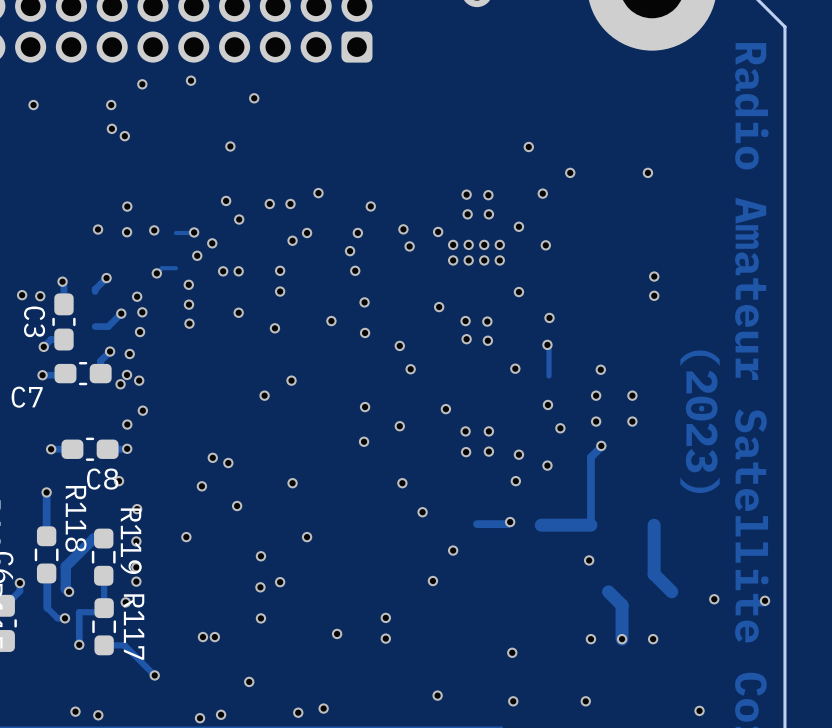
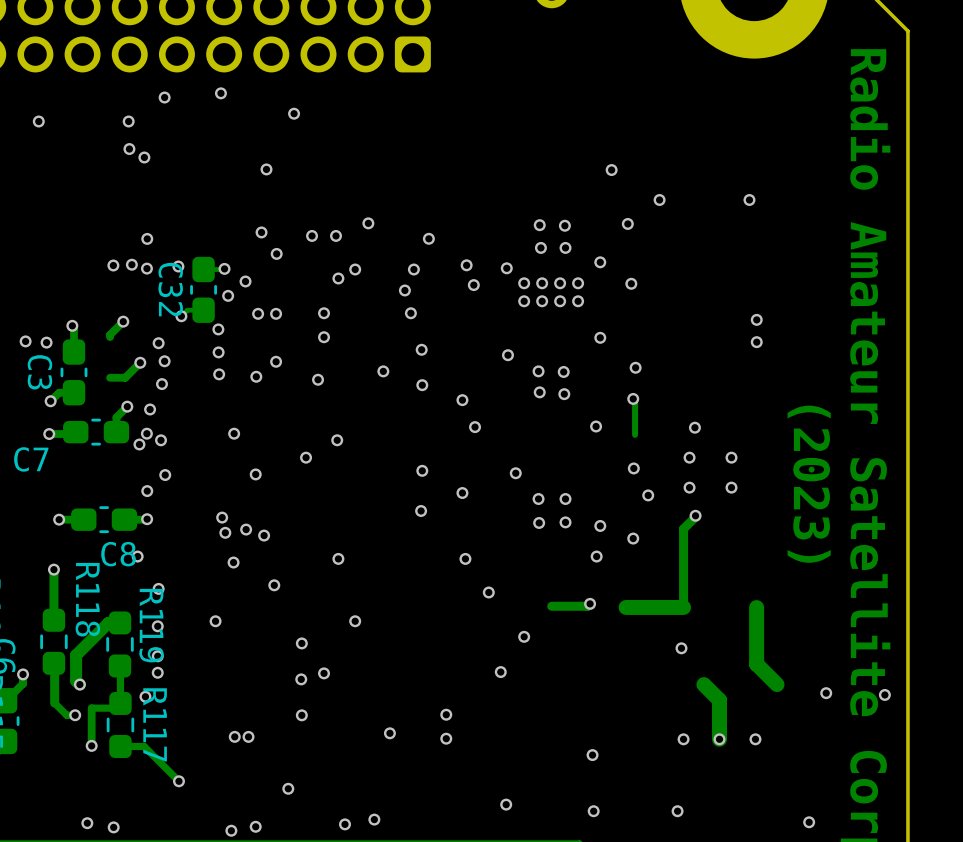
via: none -> (131, 264)
C32: none -> (203, 289)
via: none -> (256, 376)
via: none -> (234, 433)
via: none -> (255, 474)
via: none -> (222, 517)
via: none -> (225, 532)

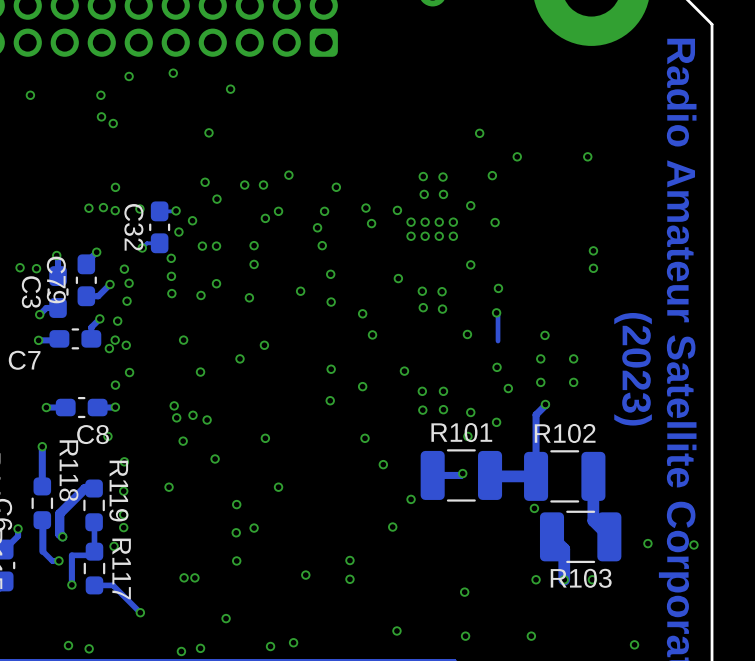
C79: none -> (86, 280)
R101: none -> (461, 475)
R102: none -> (564, 476)
R103: none -> (580, 536)

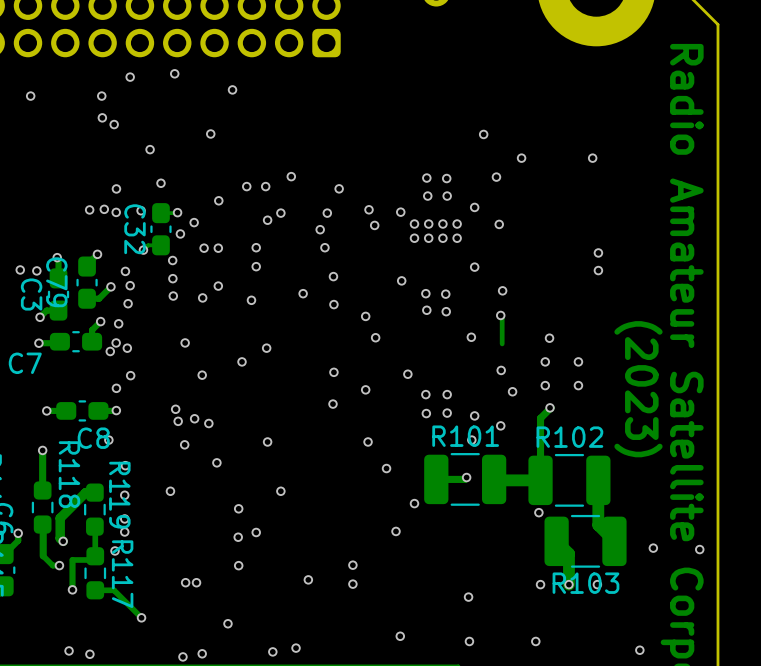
via: none -> (150, 149)
via: none -> (160, 183)
via: (205, 182) -> none

